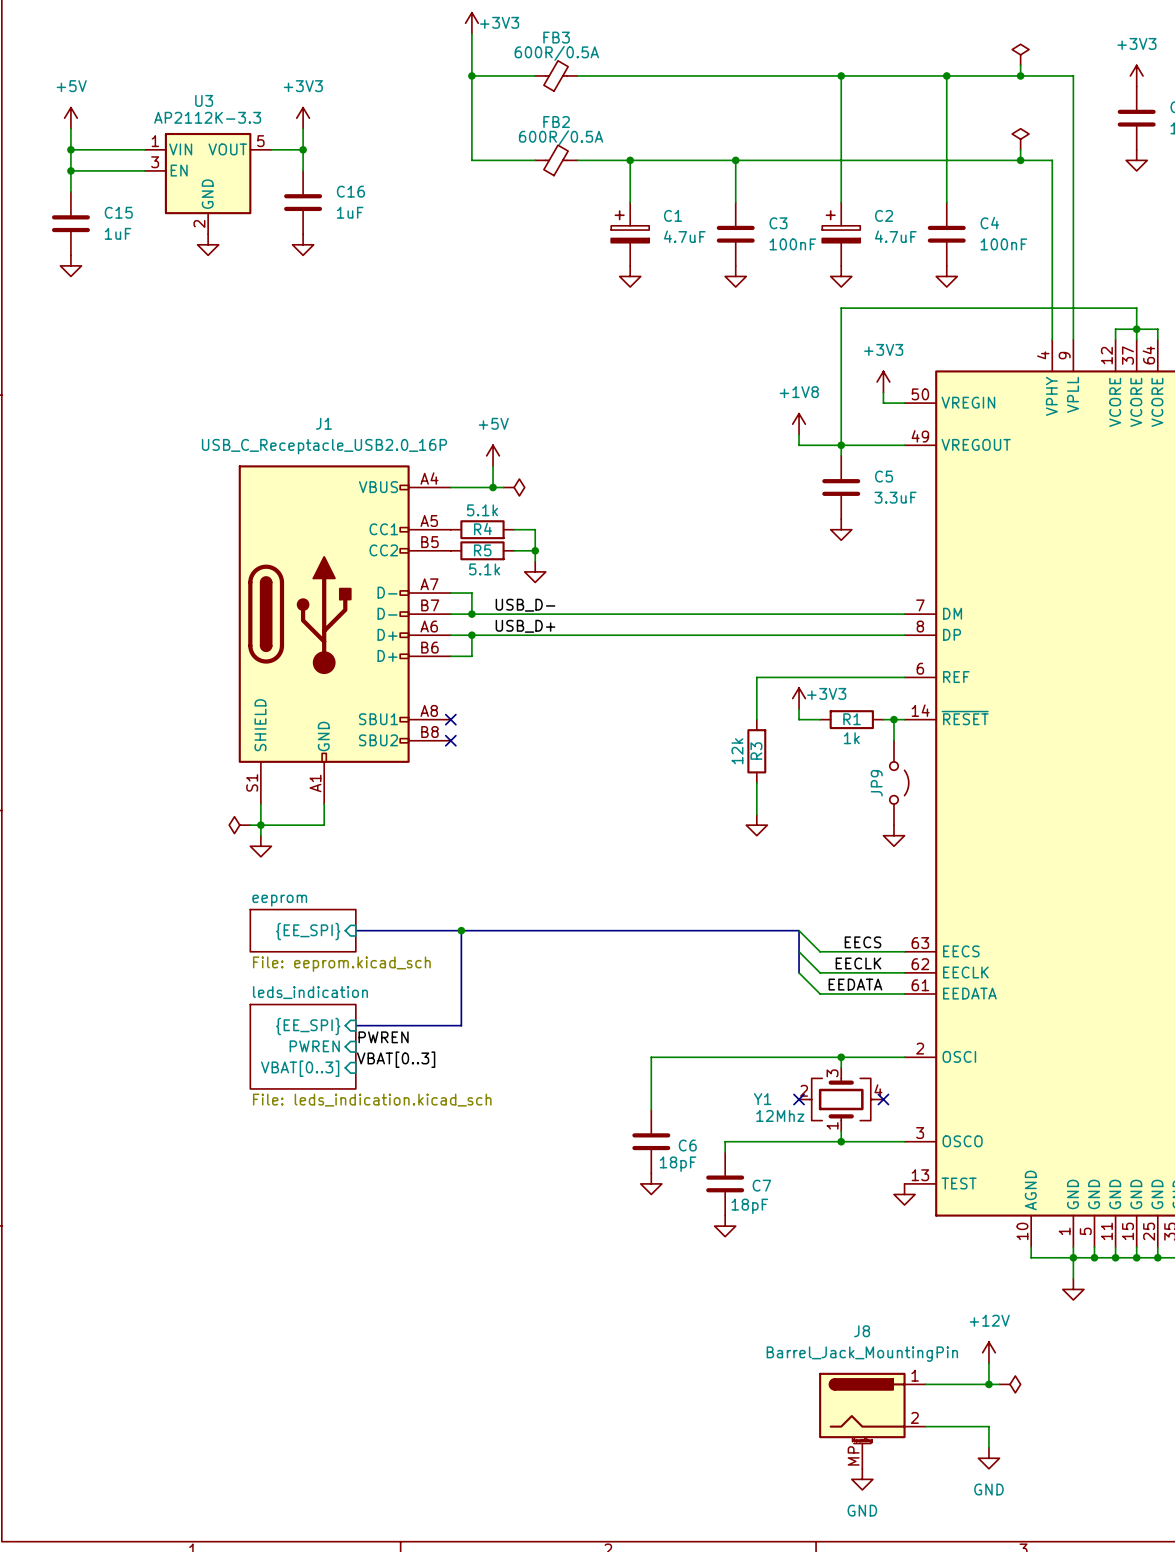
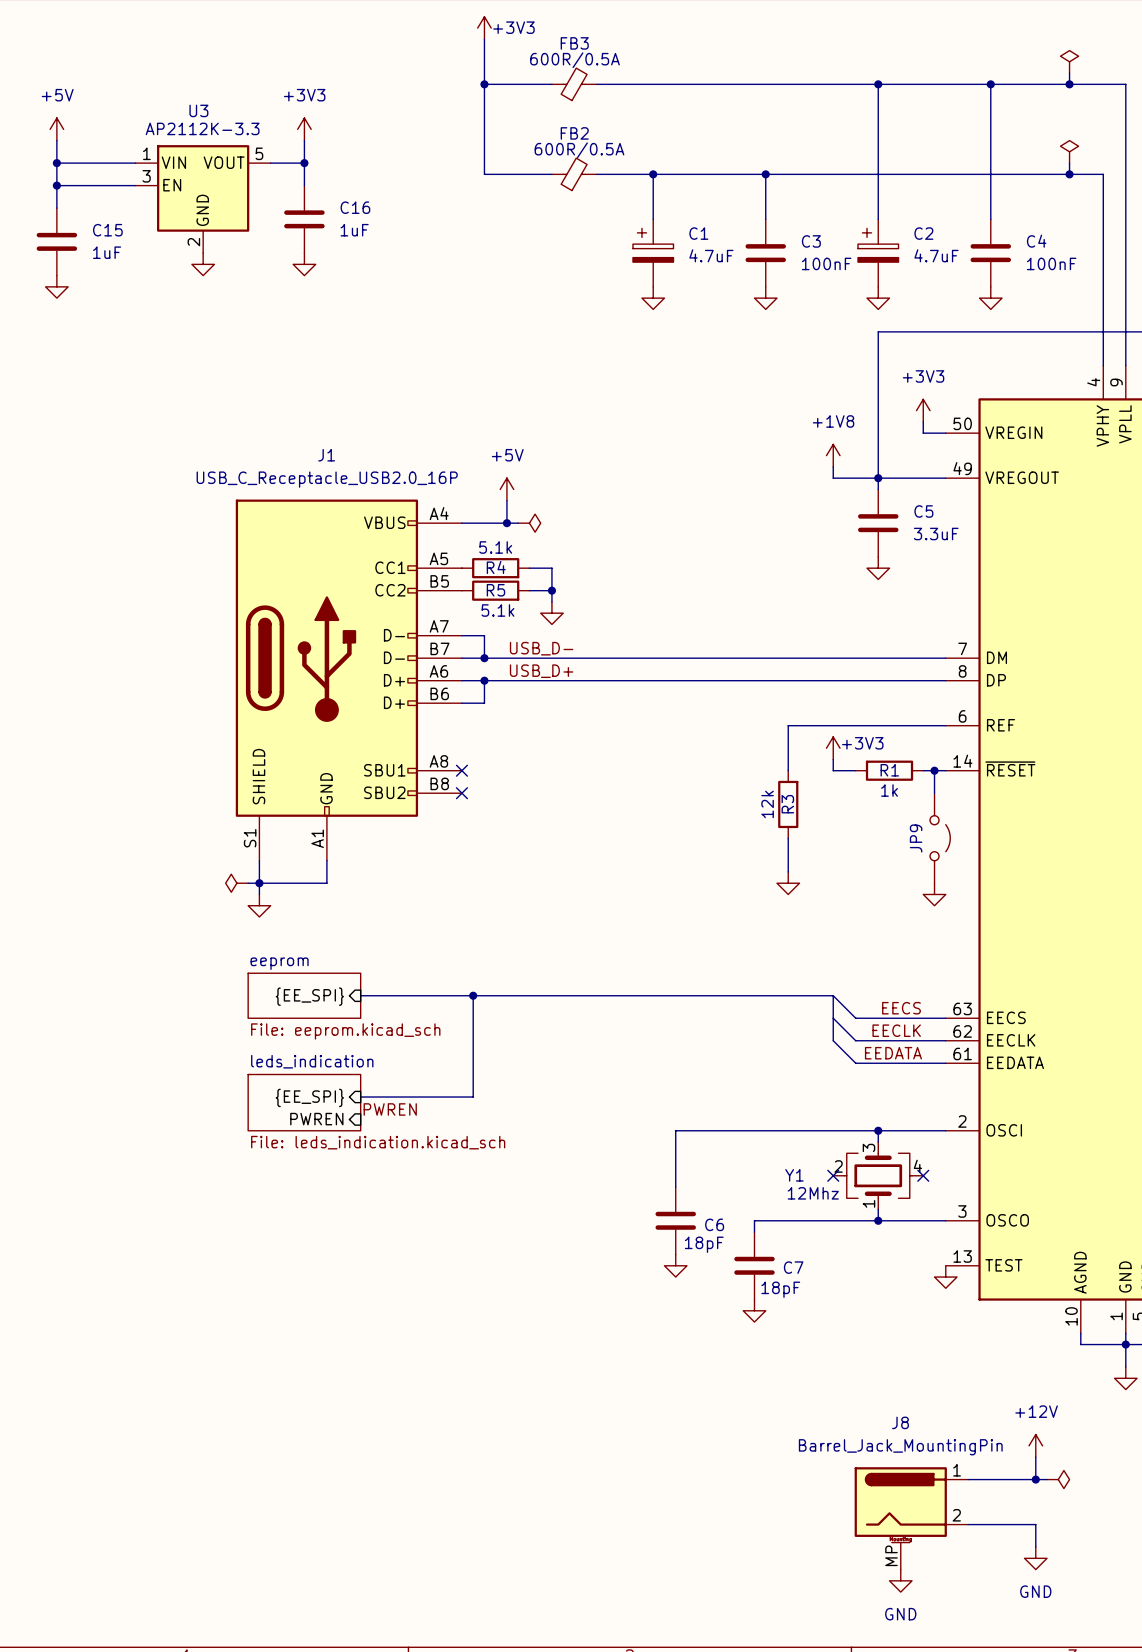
sheet leds_indication: none -> File: leds_indication.kicad_sch (304, 1102)
sheet leds_indication: File: leds_indication.kicad_sch (303, 1046) -> none
label: VBAT[0..3] (396, 1059) -> none
sheet pin: VBAT[0..3] (300, 1068) -> none

